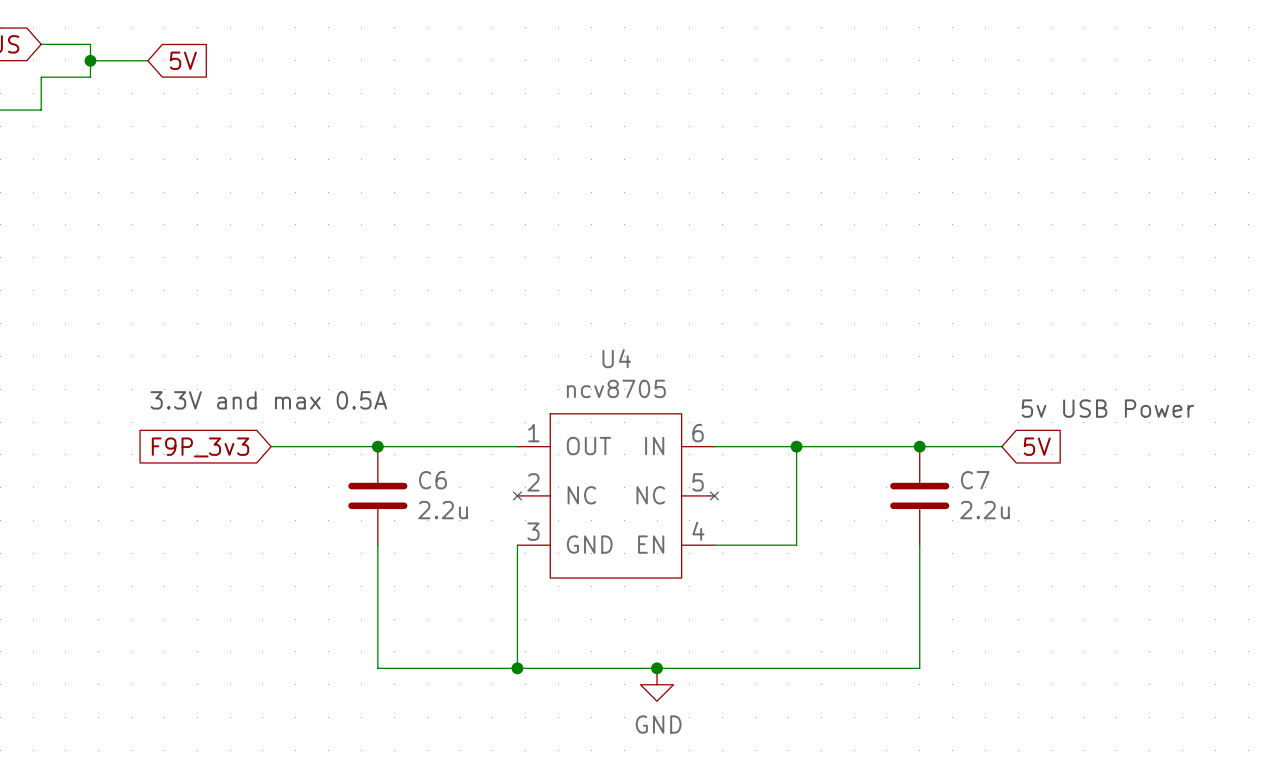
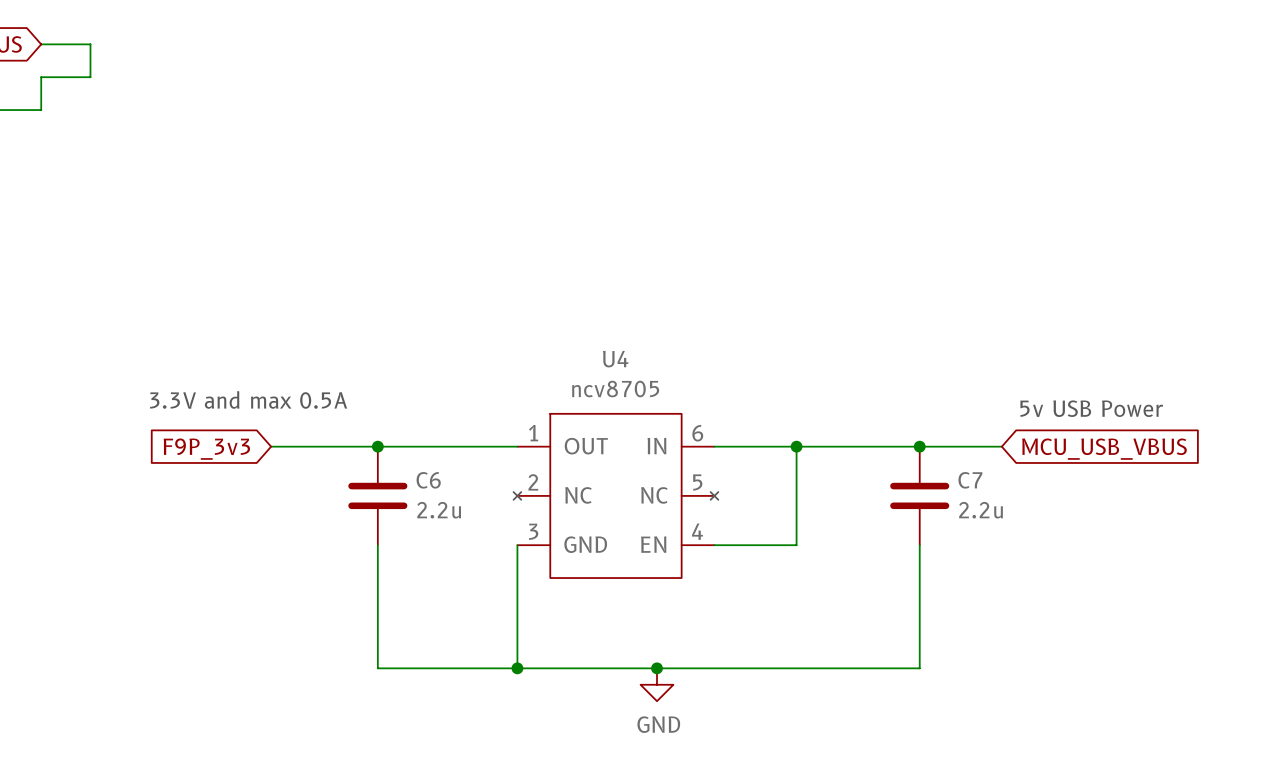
wire: (90, 60) (147, 60) -> none
junction: (90, 60) -> none
global label: 5V (183, 60) -> none
global label: 5V (1037, 446) -> MCU_USB_VBUS (1104, 449)

